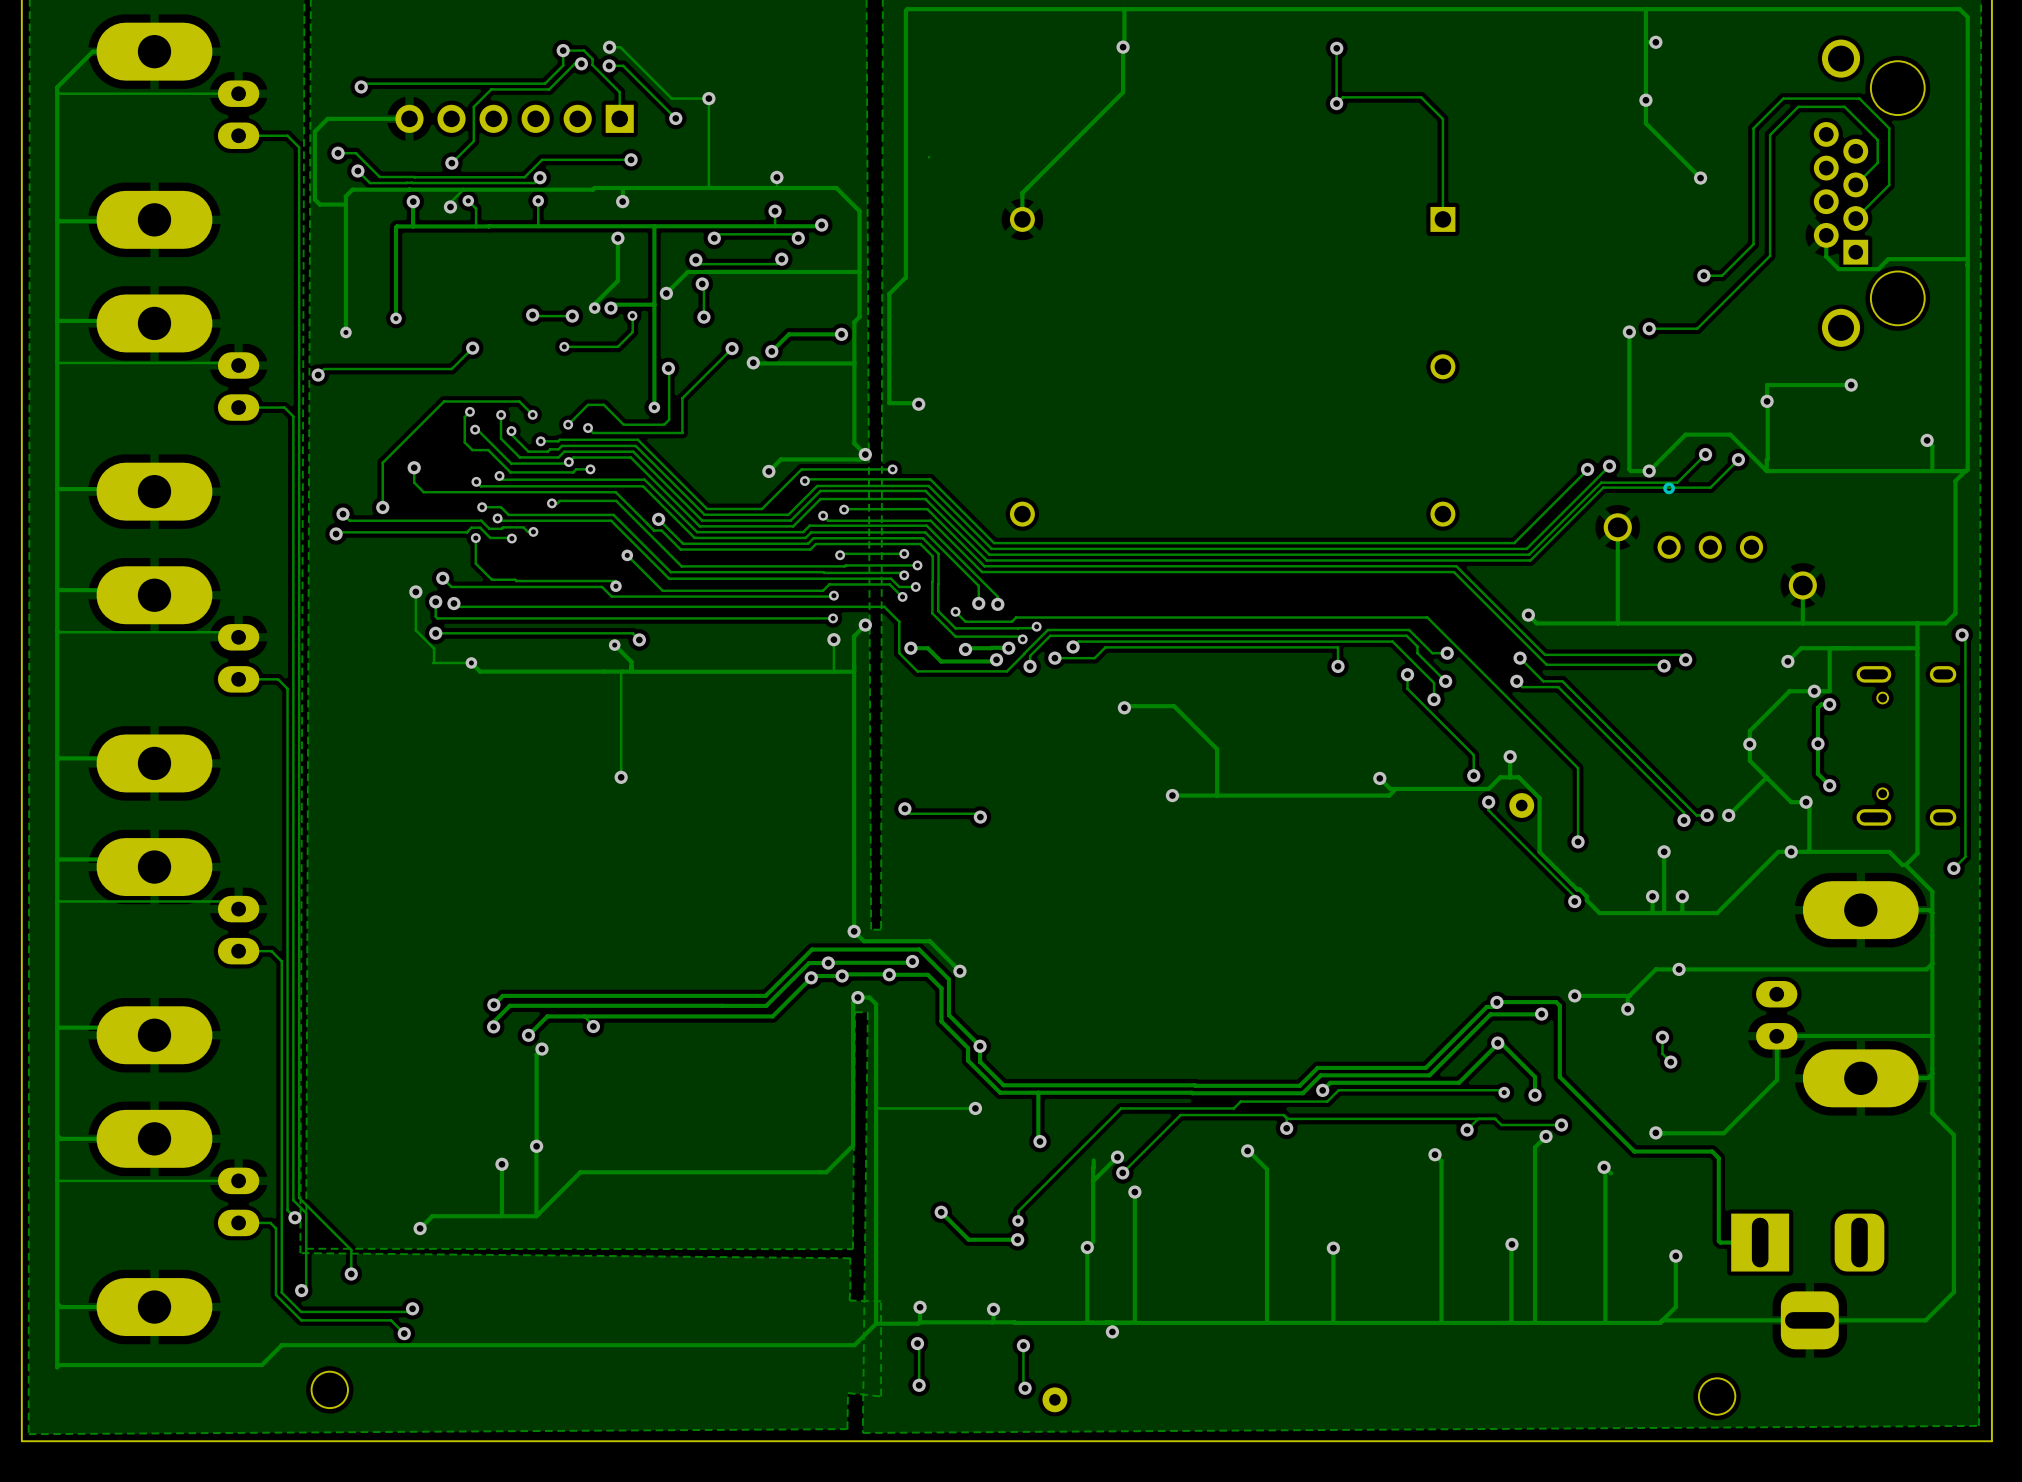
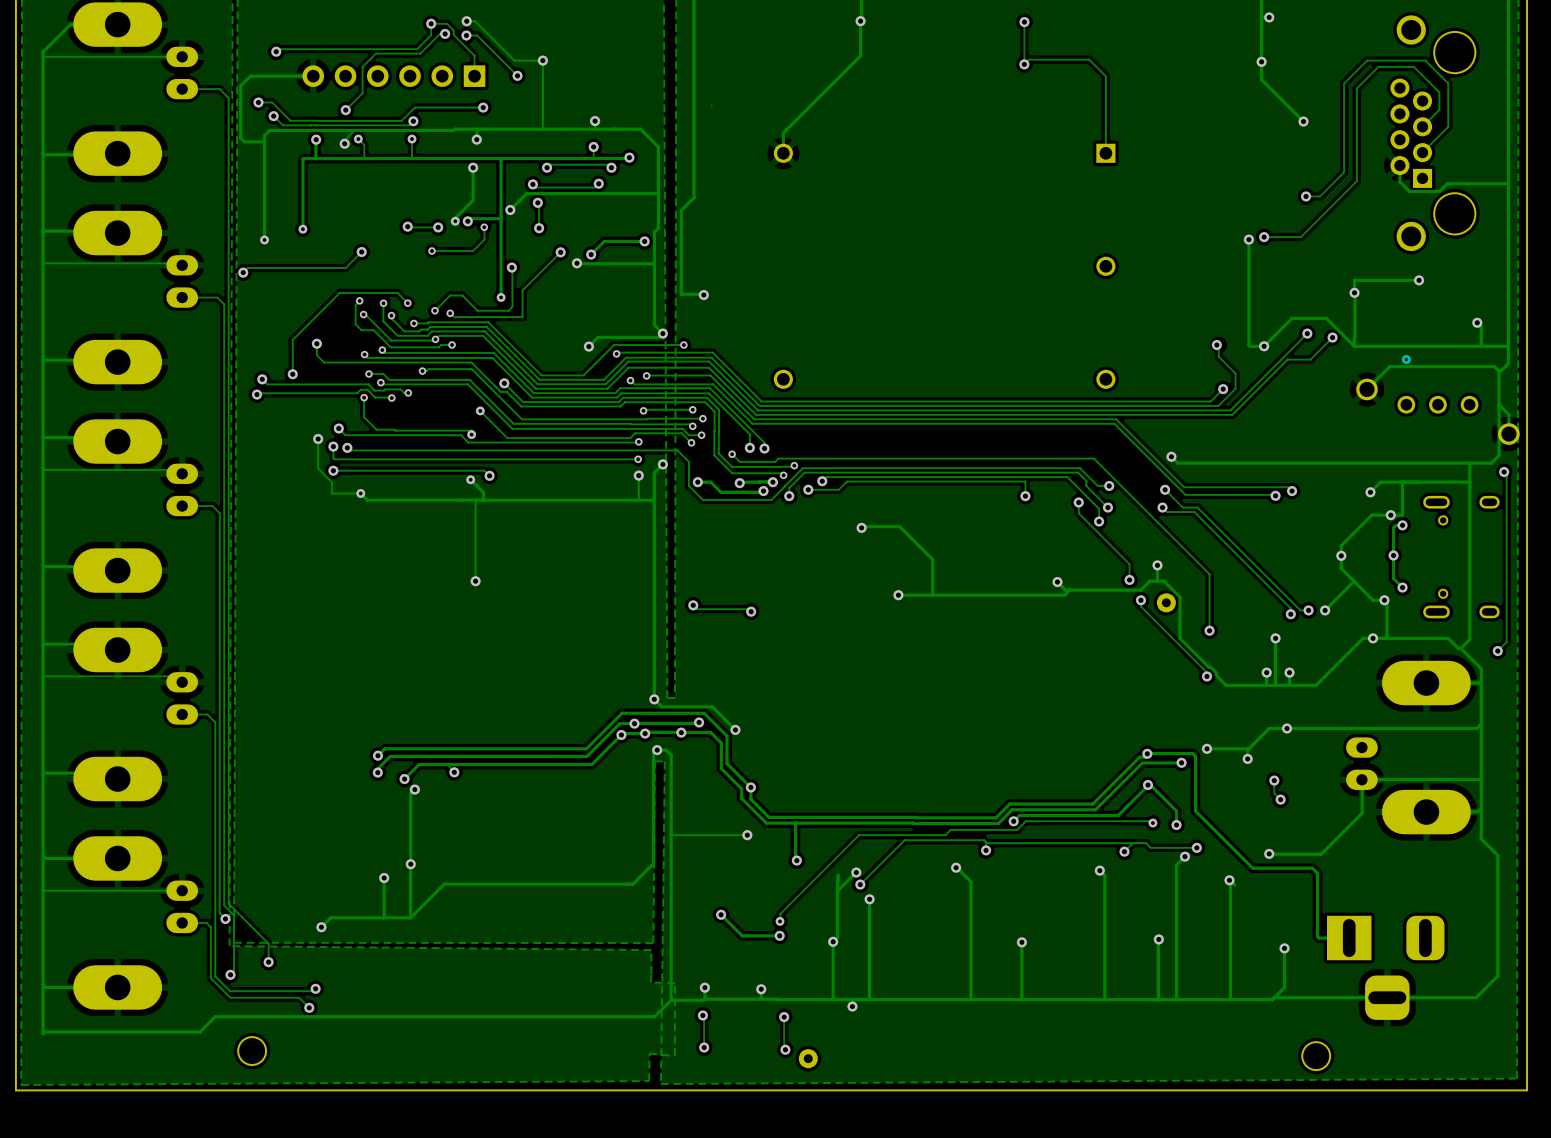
track: (1609, 466) (1526, 548) -> (1218, 345) (1218, 356) (1235, 373) (1235, 388) (1218, 405) (1170, 405)
via position: (1609, 466) -> (1223, 389)
track: (1587, 469) (1514, 543) -> (1223, 389) (1210, 401) (1160, 401)
track: (1967, 469) (1955, 481) (1955, 503) -> (1508, 345) (1508, 363) (1500, 371) (1494, 366) (1389, 366) (1367, 389)
track: (1677, 482) (1601, 482) (1529, 554) -> (1285, 355) (1230, 410) (1172, 410)
track: (1710, 487) (1603, 487) (1530, 560) -> (1311, 359) (1287, 359) (1232, 414) (1173, 414)
track: (1617, 527) (1617, 623) -> none
part position: (1710, 541) -> (1437, 399)
track: none -> (1499, 404) (1508, 414) (1508, 434)
track: (1802, 585) (1803, 623) -> none

